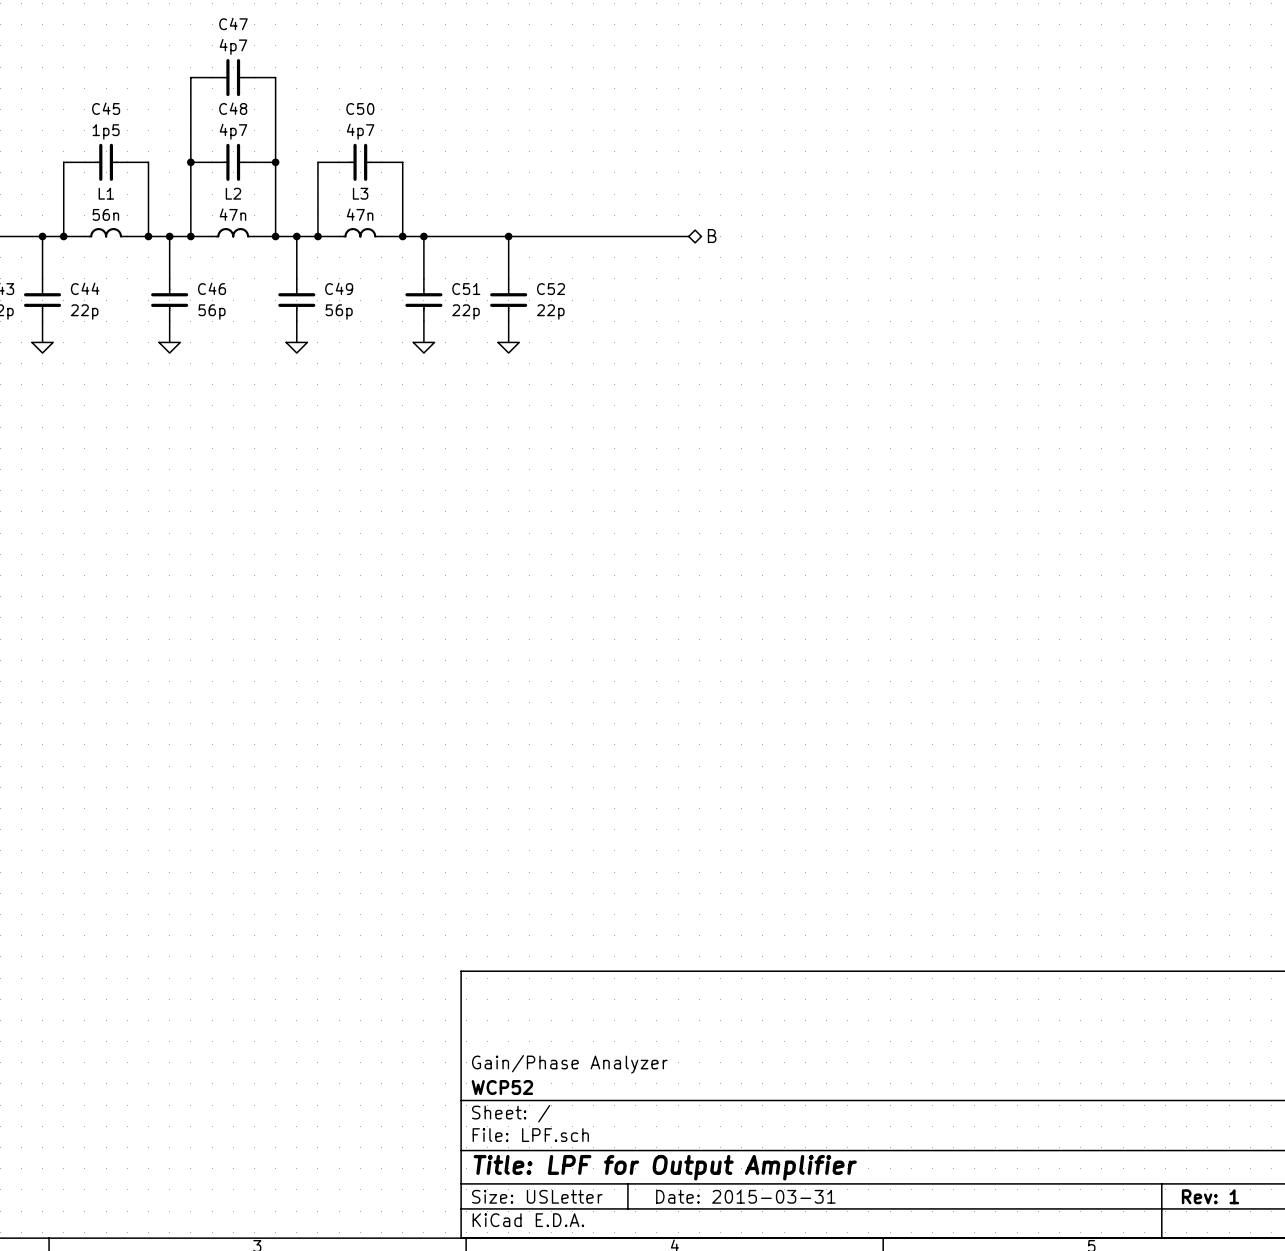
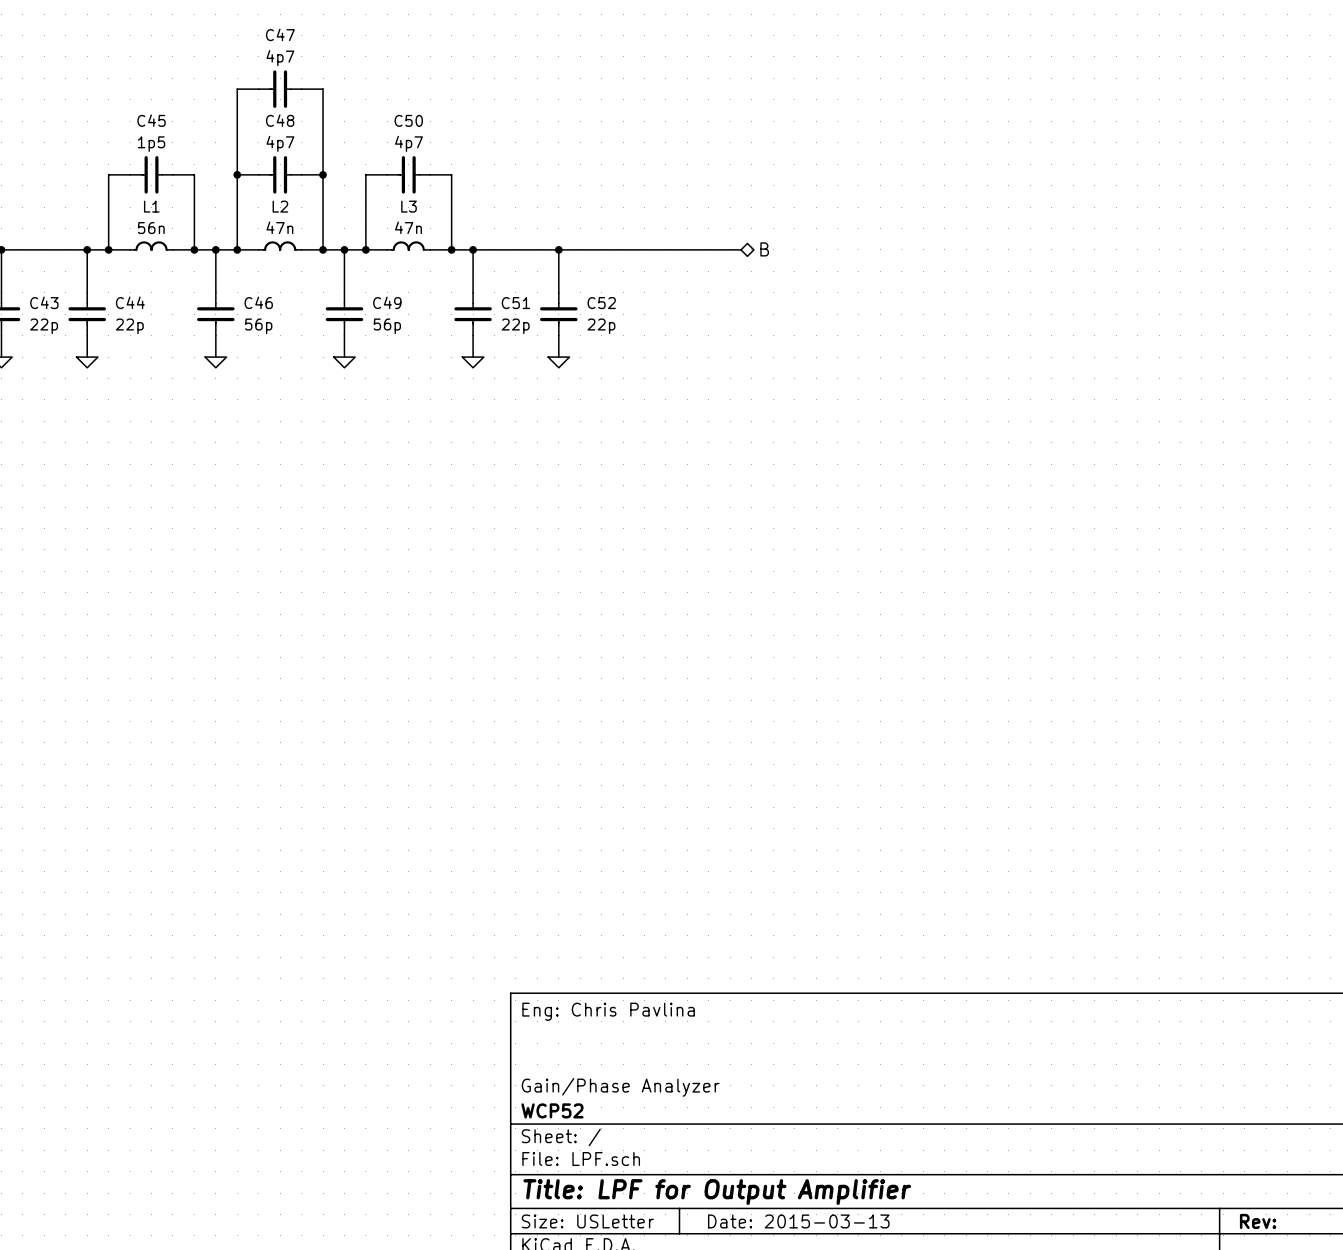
title block: none -> Eng: Chris Pavlina (608, 1011)
title block: Date: 2015-03-31 (745, 1196) -> Date: 2015-03-13 (798, 1221)
title block: Rev: 1 (1210, 1196) -> Rev: (1258, 1221)

